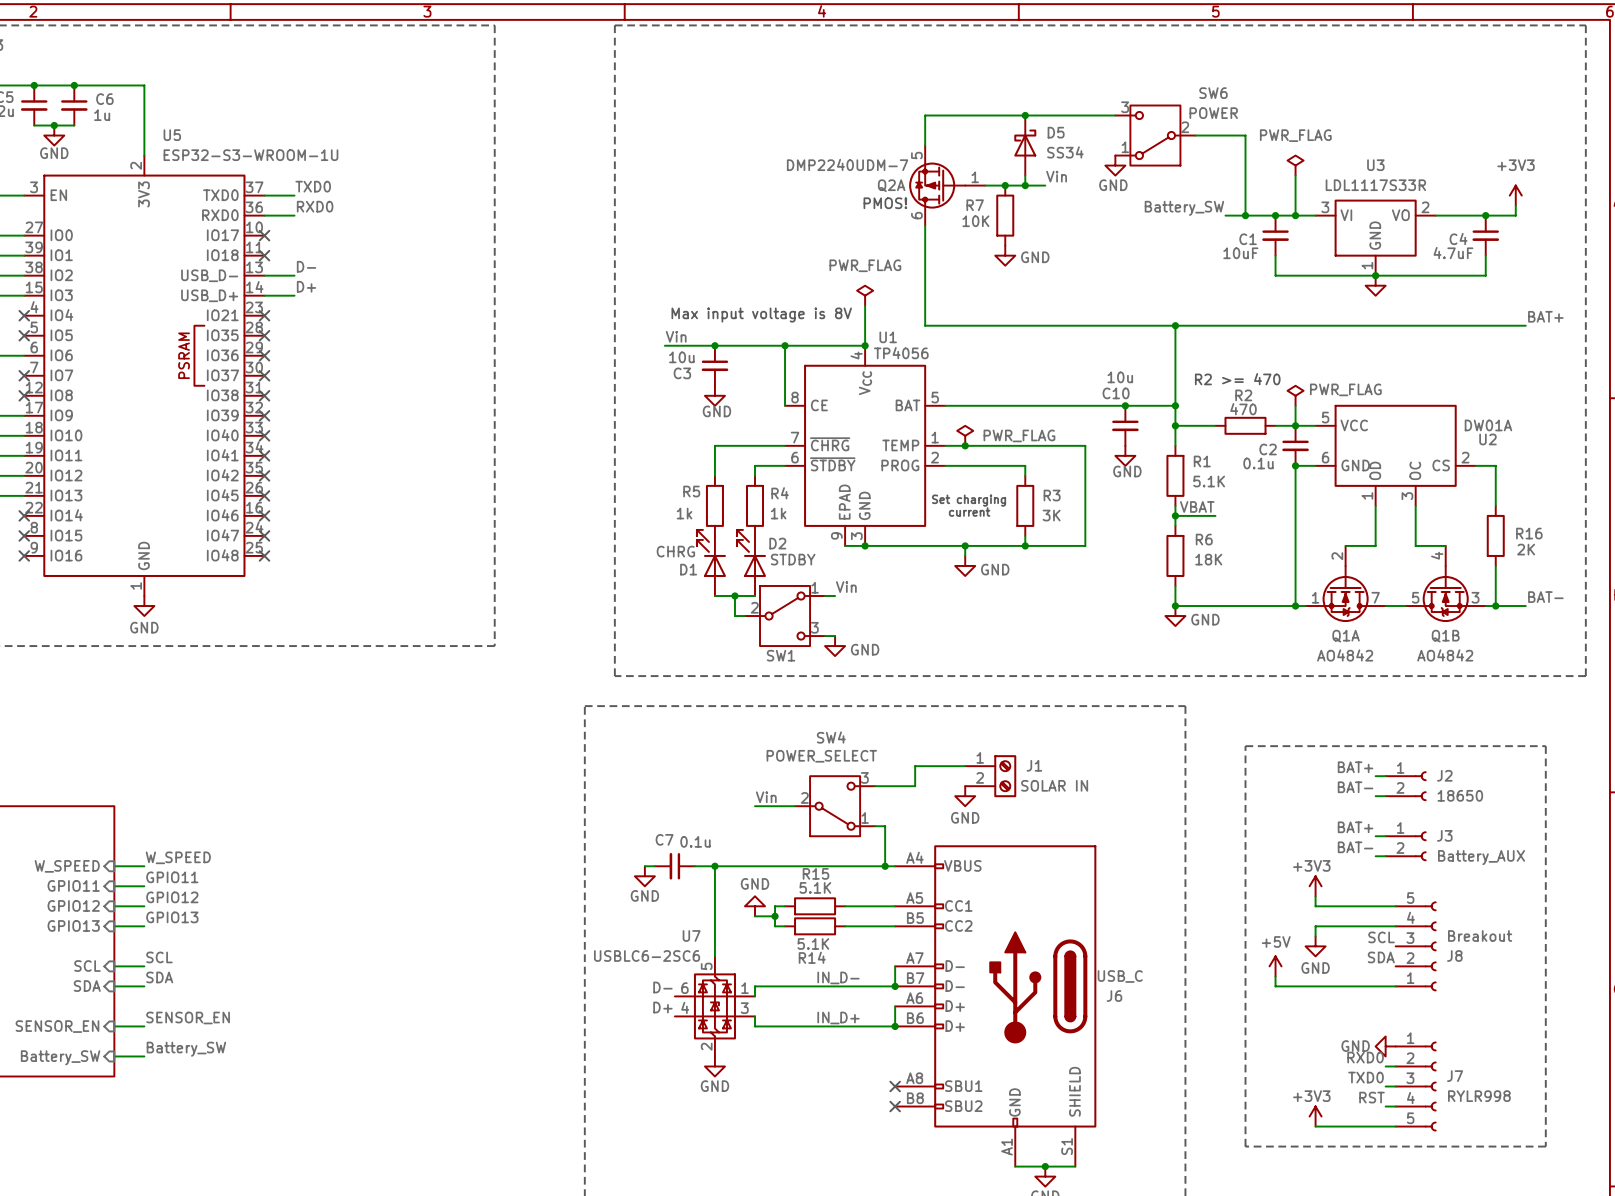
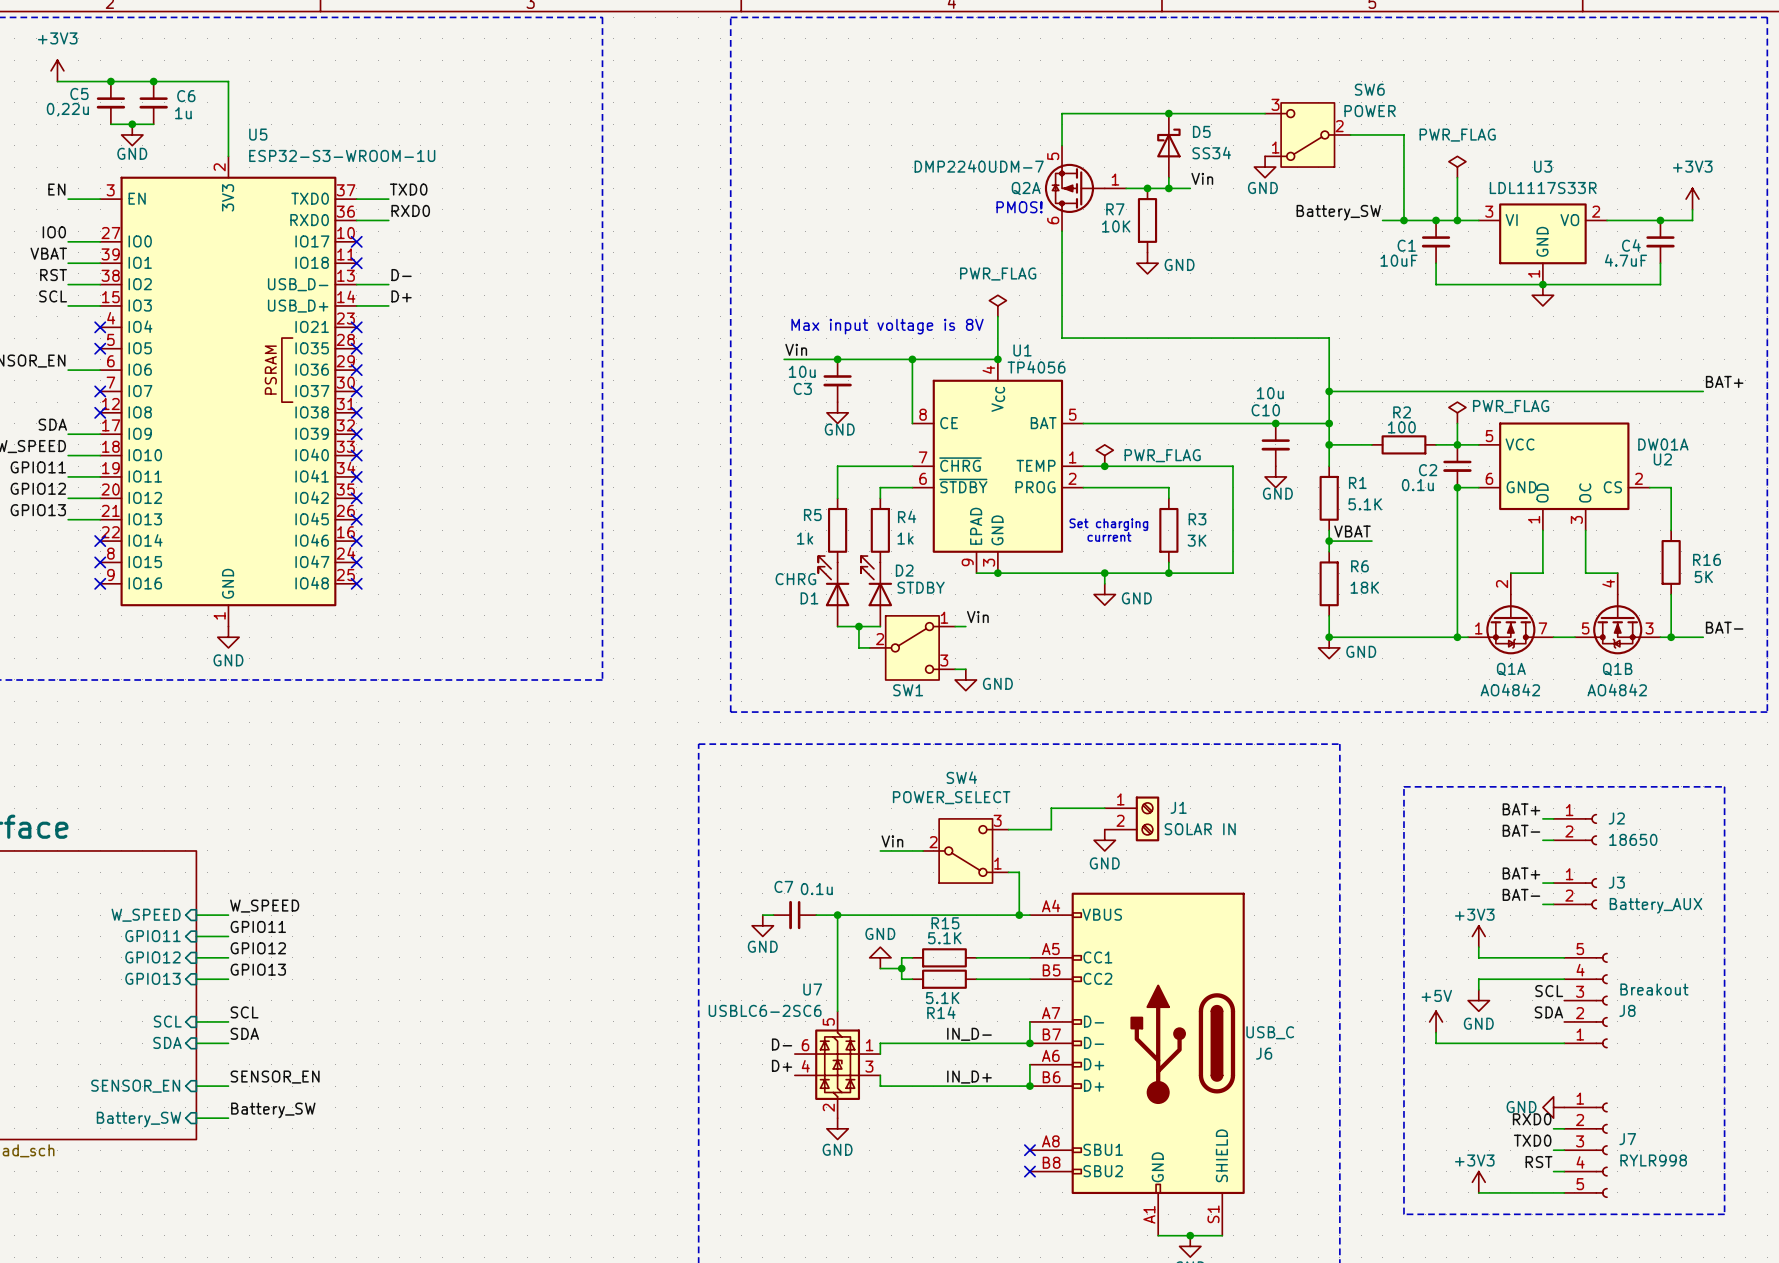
label position: BAT+ (1545, 316) -> BAT+ (1724, 381)
wire: (1175, 325) (1525, 325) -> (1329, 391) (1703, 391)
junction: (1175, 325) -> none
junction: none -> (1329, 391)
text: R2 >= 470 (1237, 379) -> none
R2 value: 470 (1243, 409) -> 100 (1401, 427)
R16 value: 2K (1526, 549) -> 5K (1703, 577)

